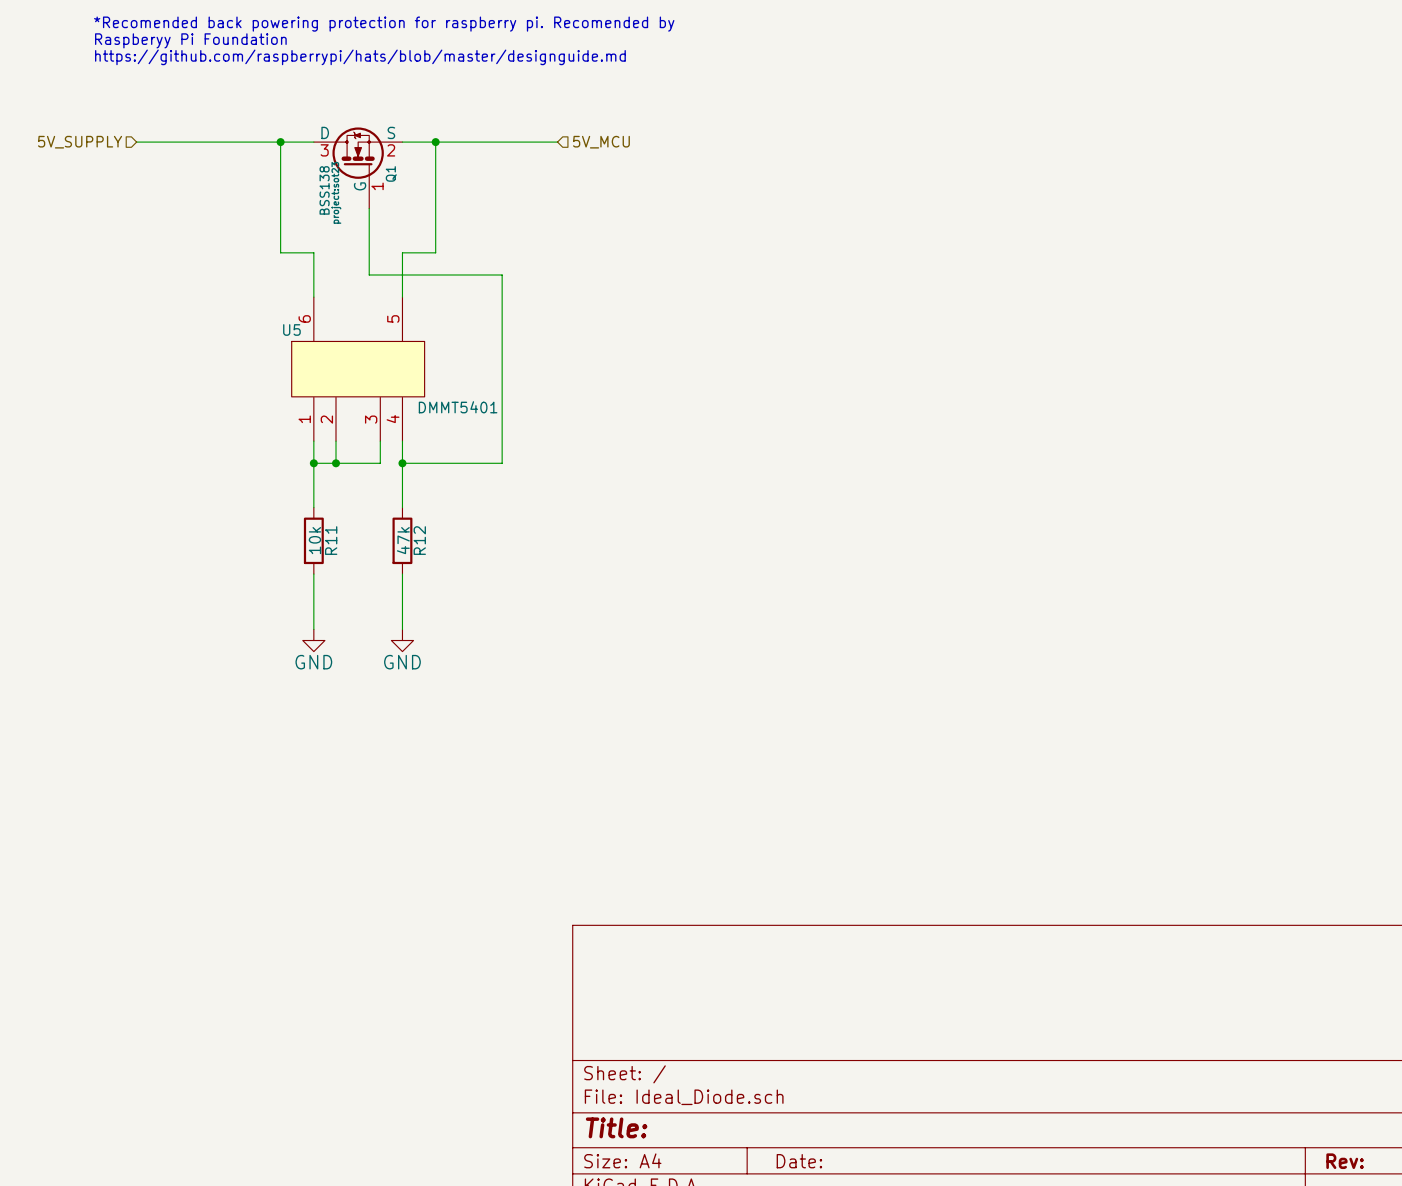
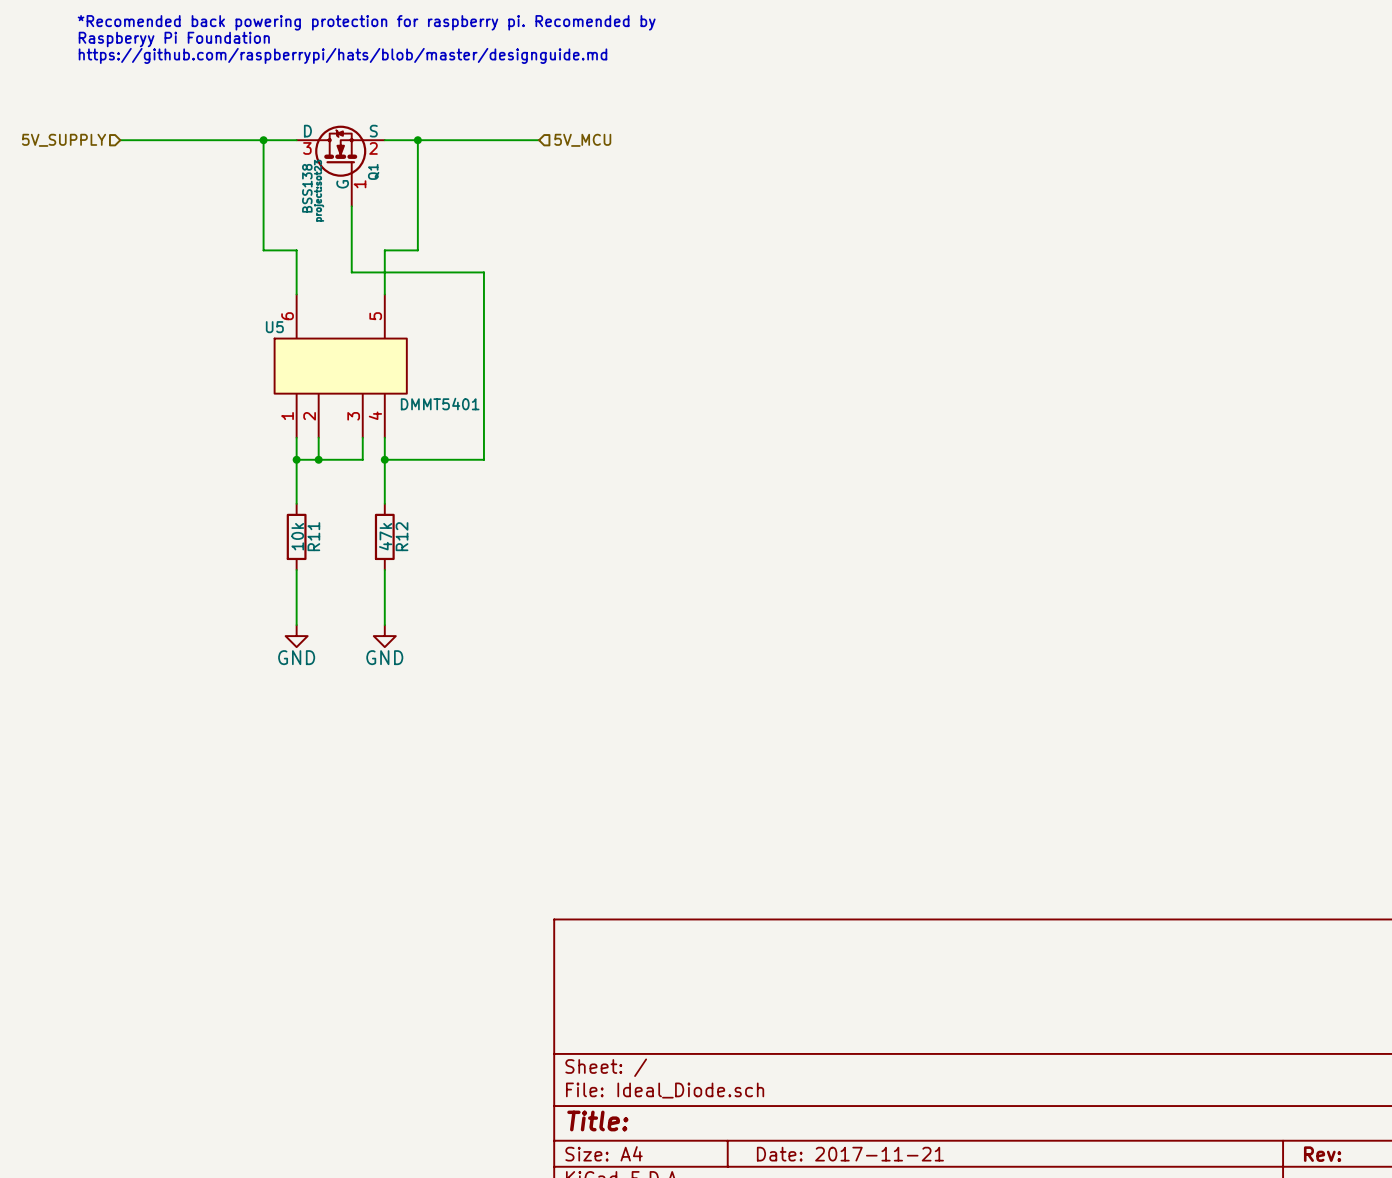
title block: Date: (799, 1161) -> Date: 2017-11-21 (850, 1154)

